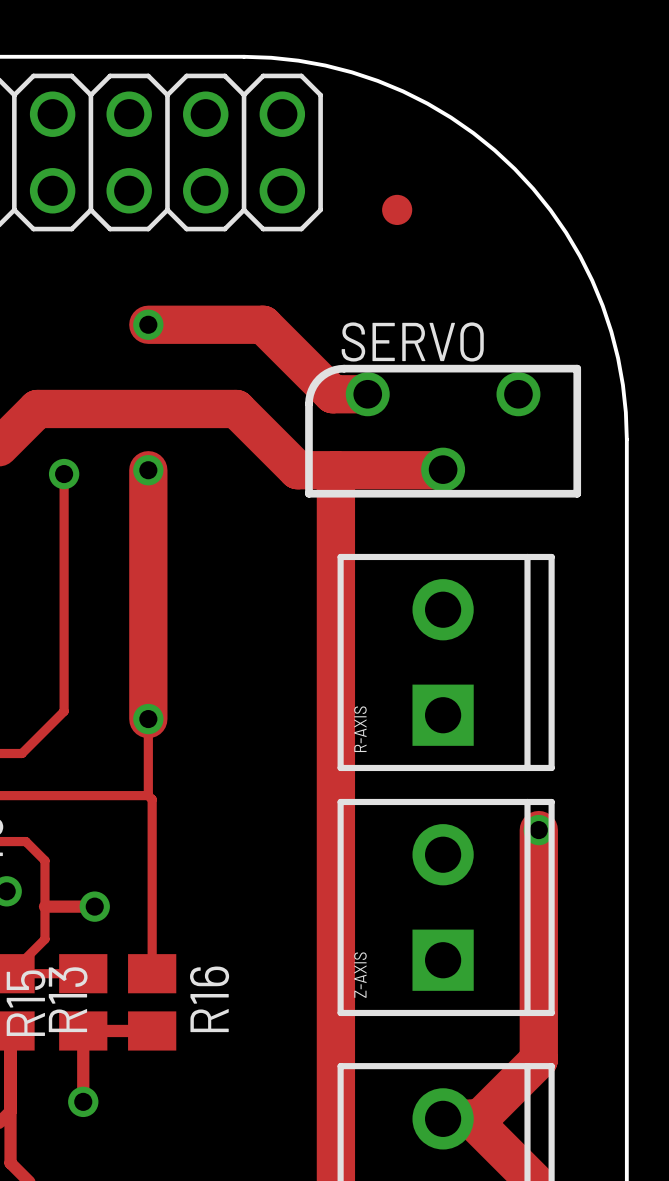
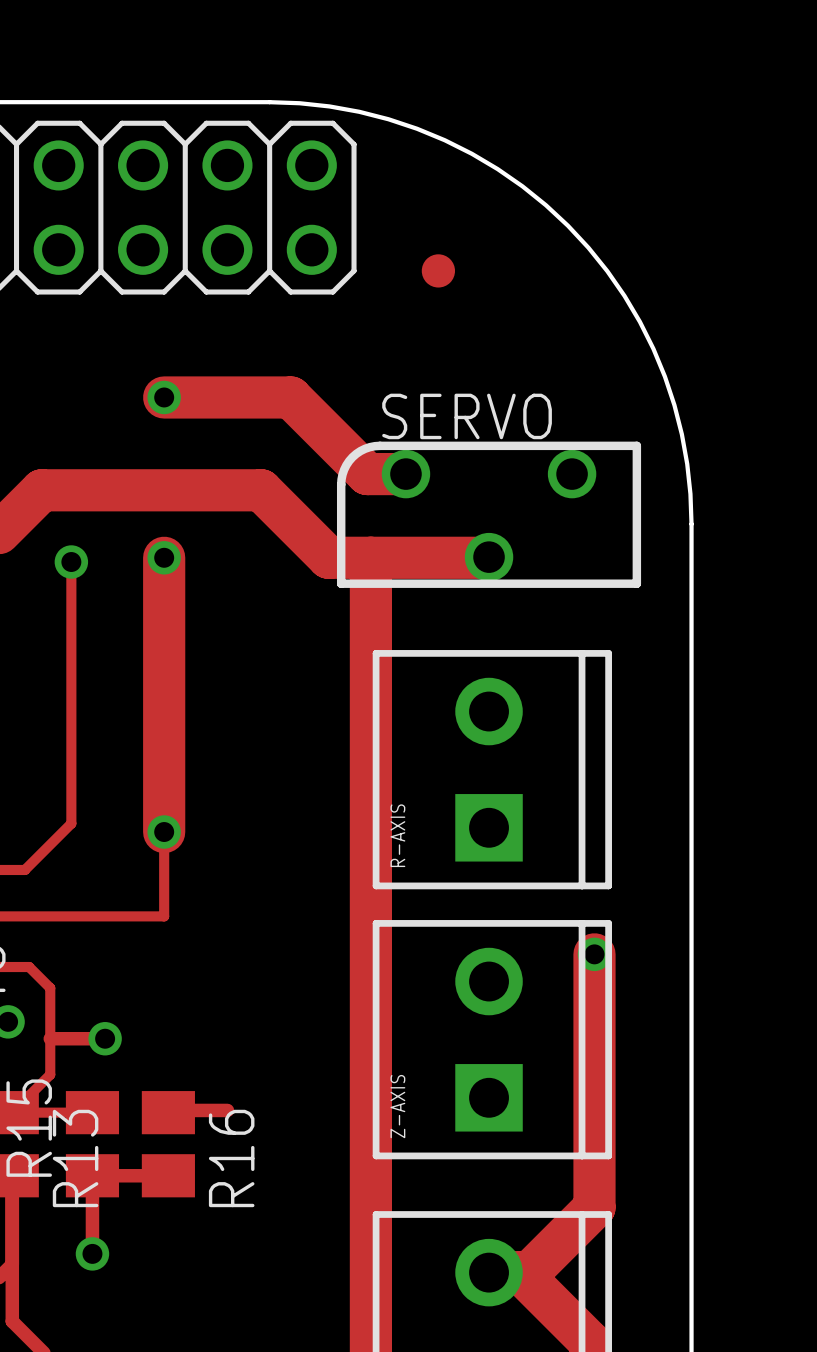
track: (148, 795) (152, 799) (152, 973) -> none
track: none -> (170, 1110) (227, 1110)

